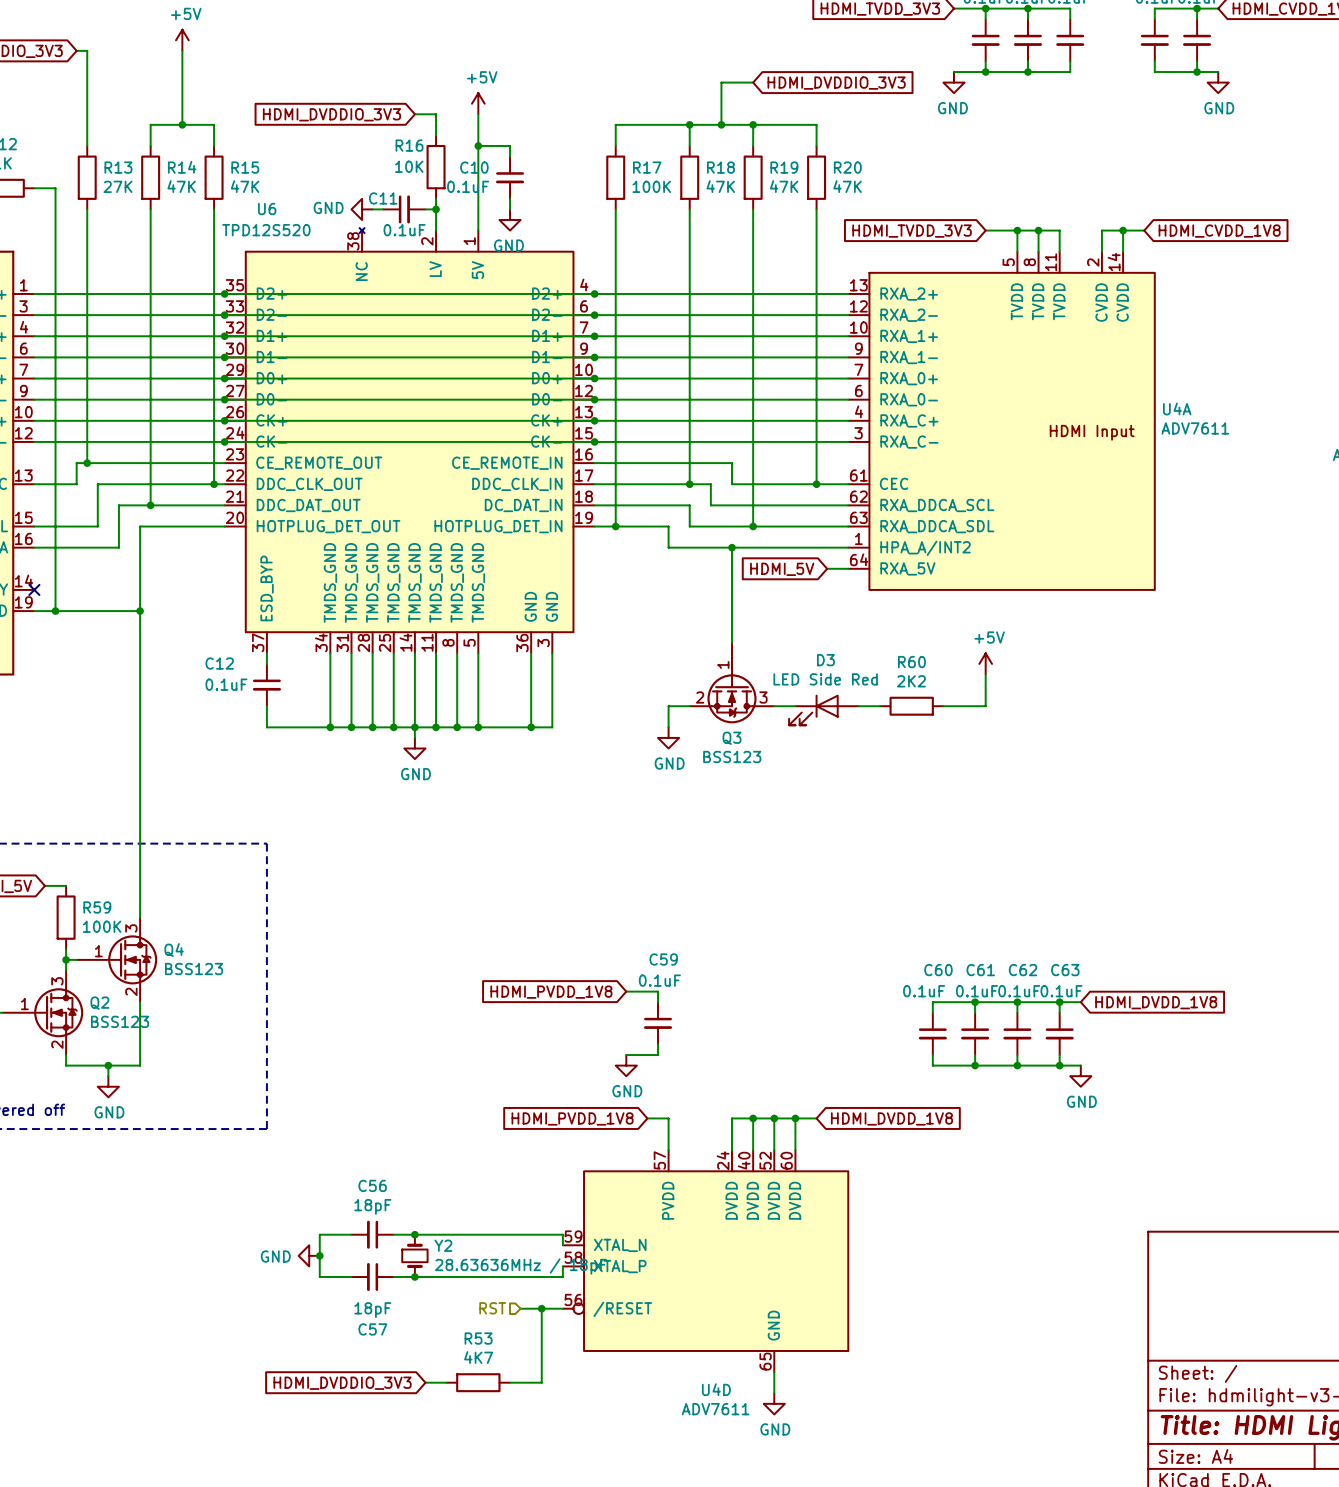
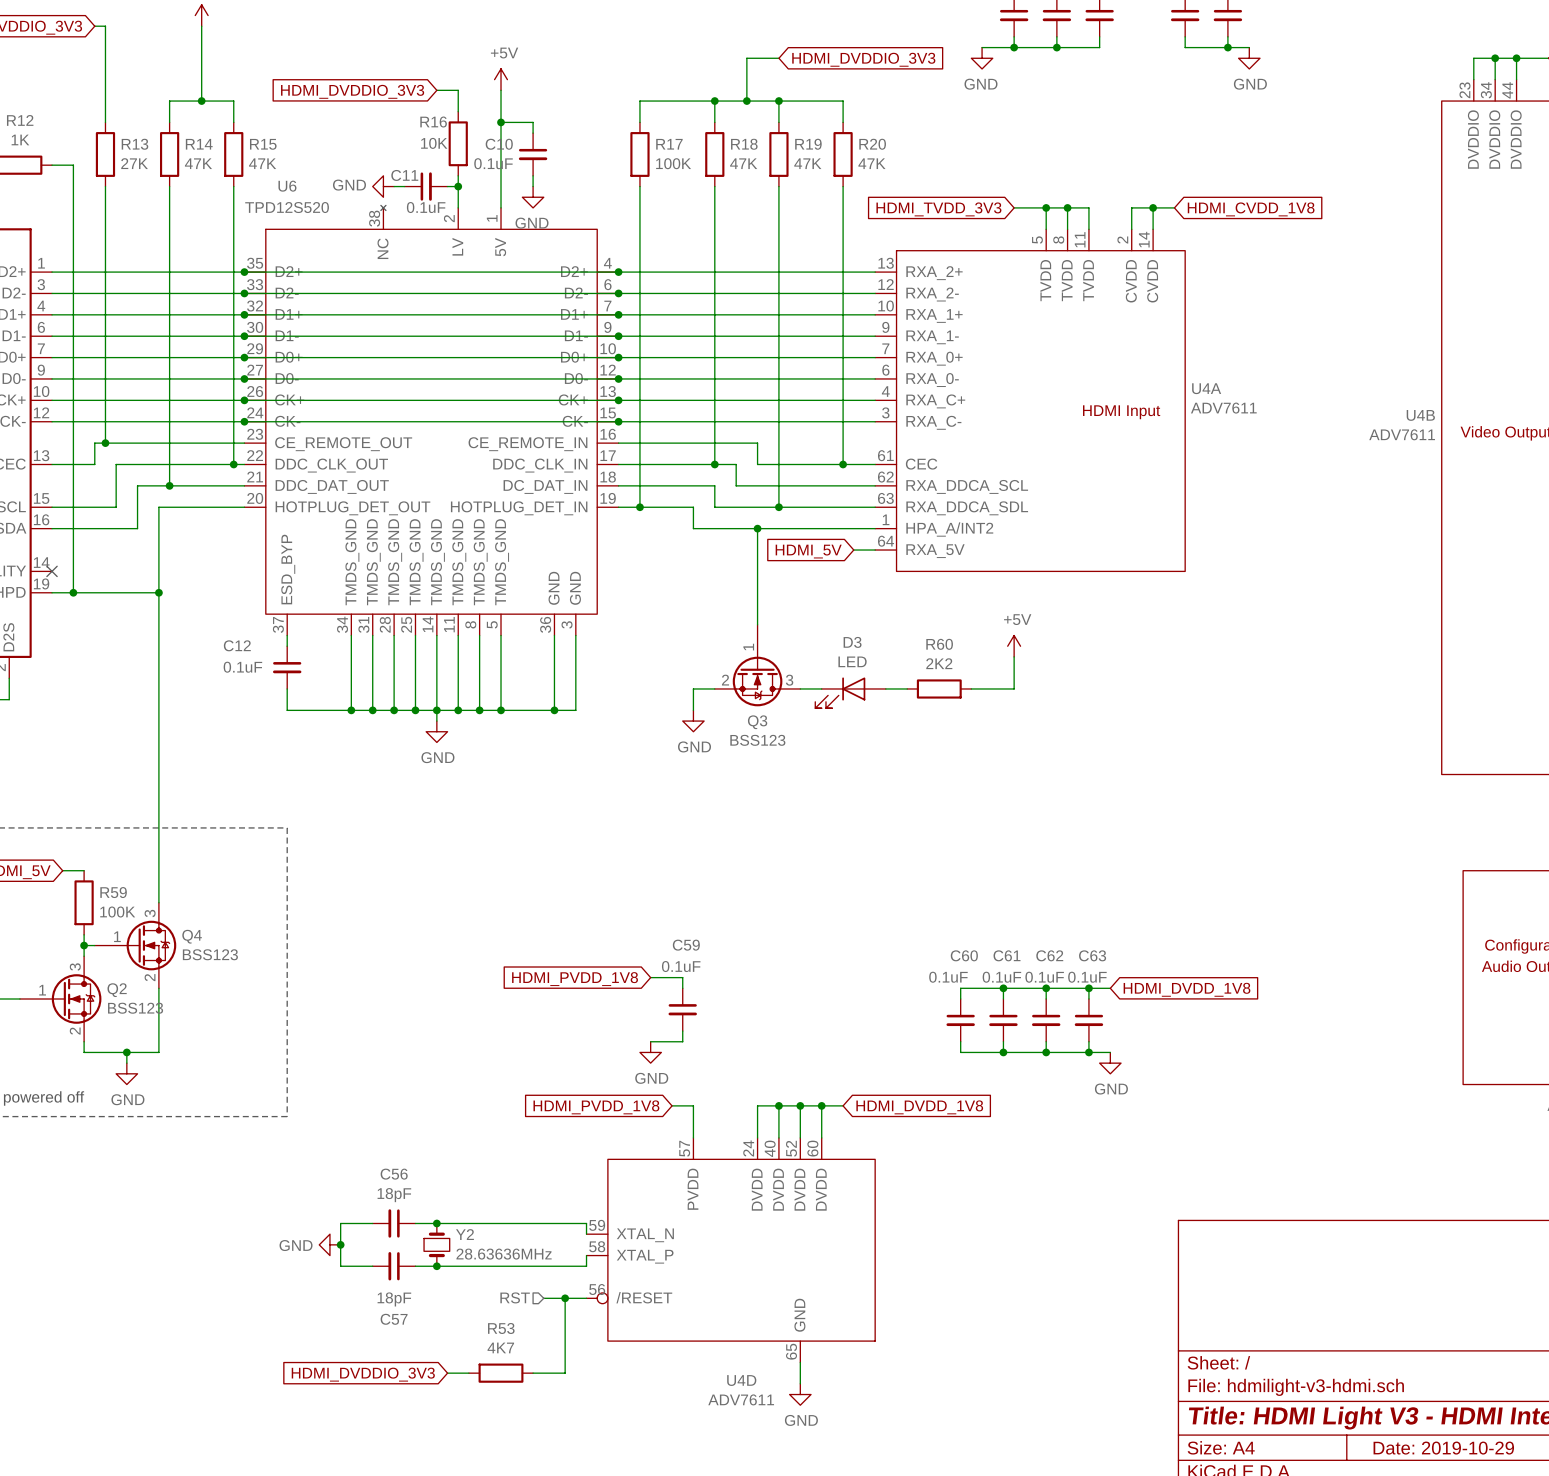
D3 value: LED Side Red (825, 679) -> LED (852, 661)
Y2 value: 28.63636MHz / 18pF (520, 1266) -> 28.63636MHz (504, 1254)

